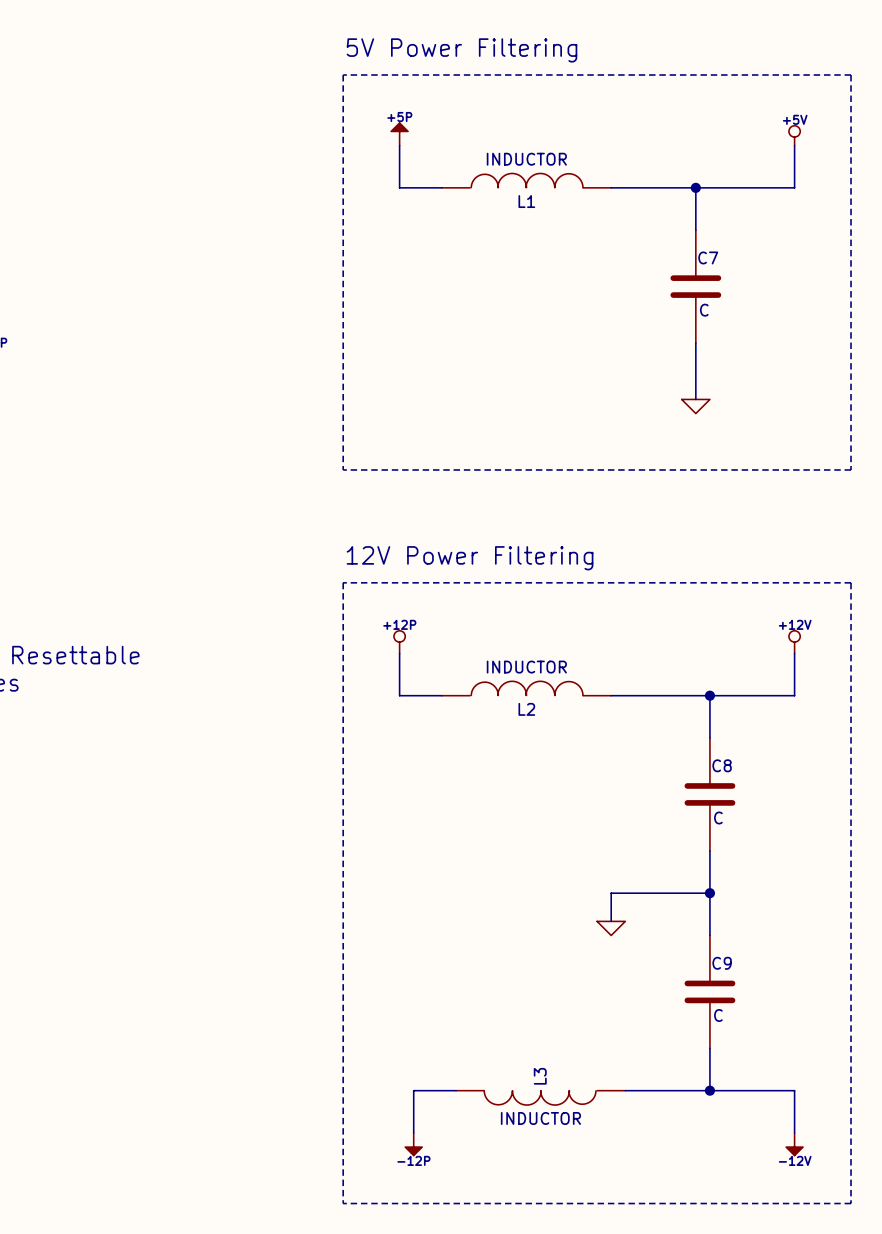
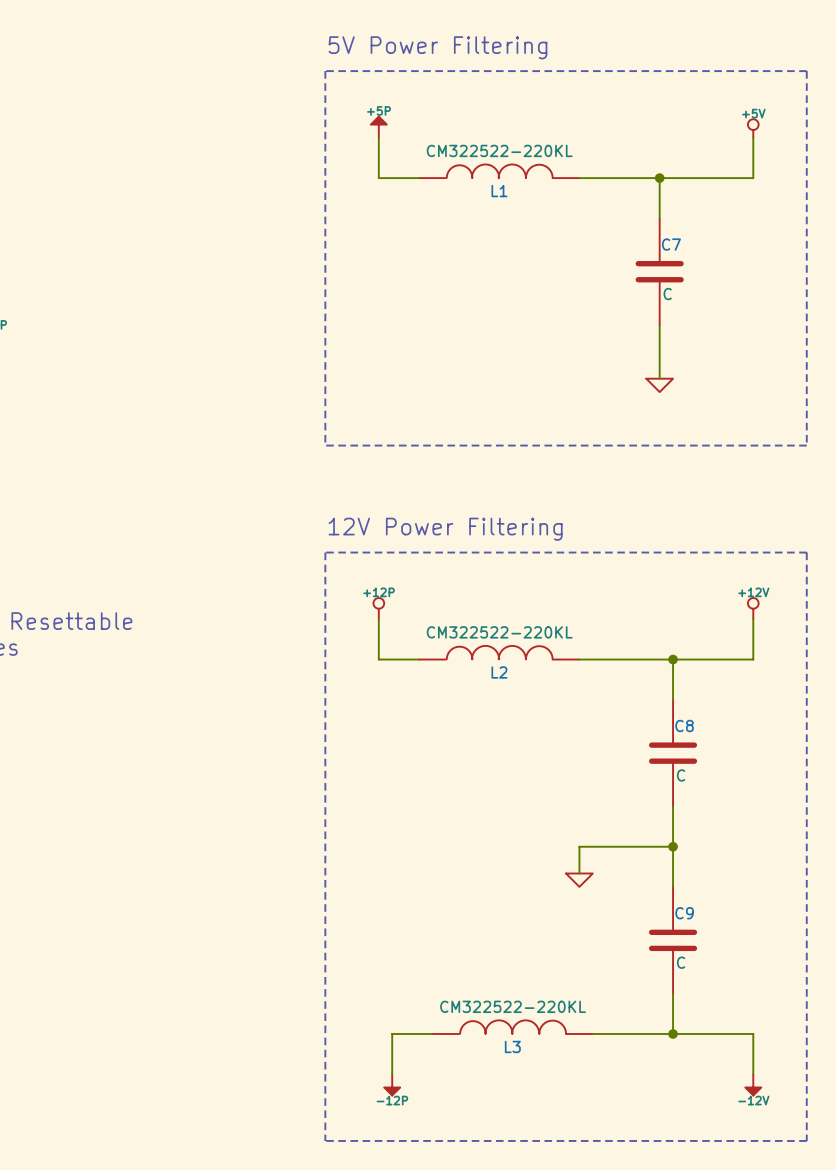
L1 value: INDUCTOR (526, 159) -> CM322522-220KL (499, 150)
L2 value: INDUCTOR (526, 667) -> CM322522-220KL (499, 632)
L3 rotation: 0° (540, 1098) -> 180° (513, 1027)
L3 value: INDUCTOR (540, 1118) -> CM322522-220KL (513, 1006)

